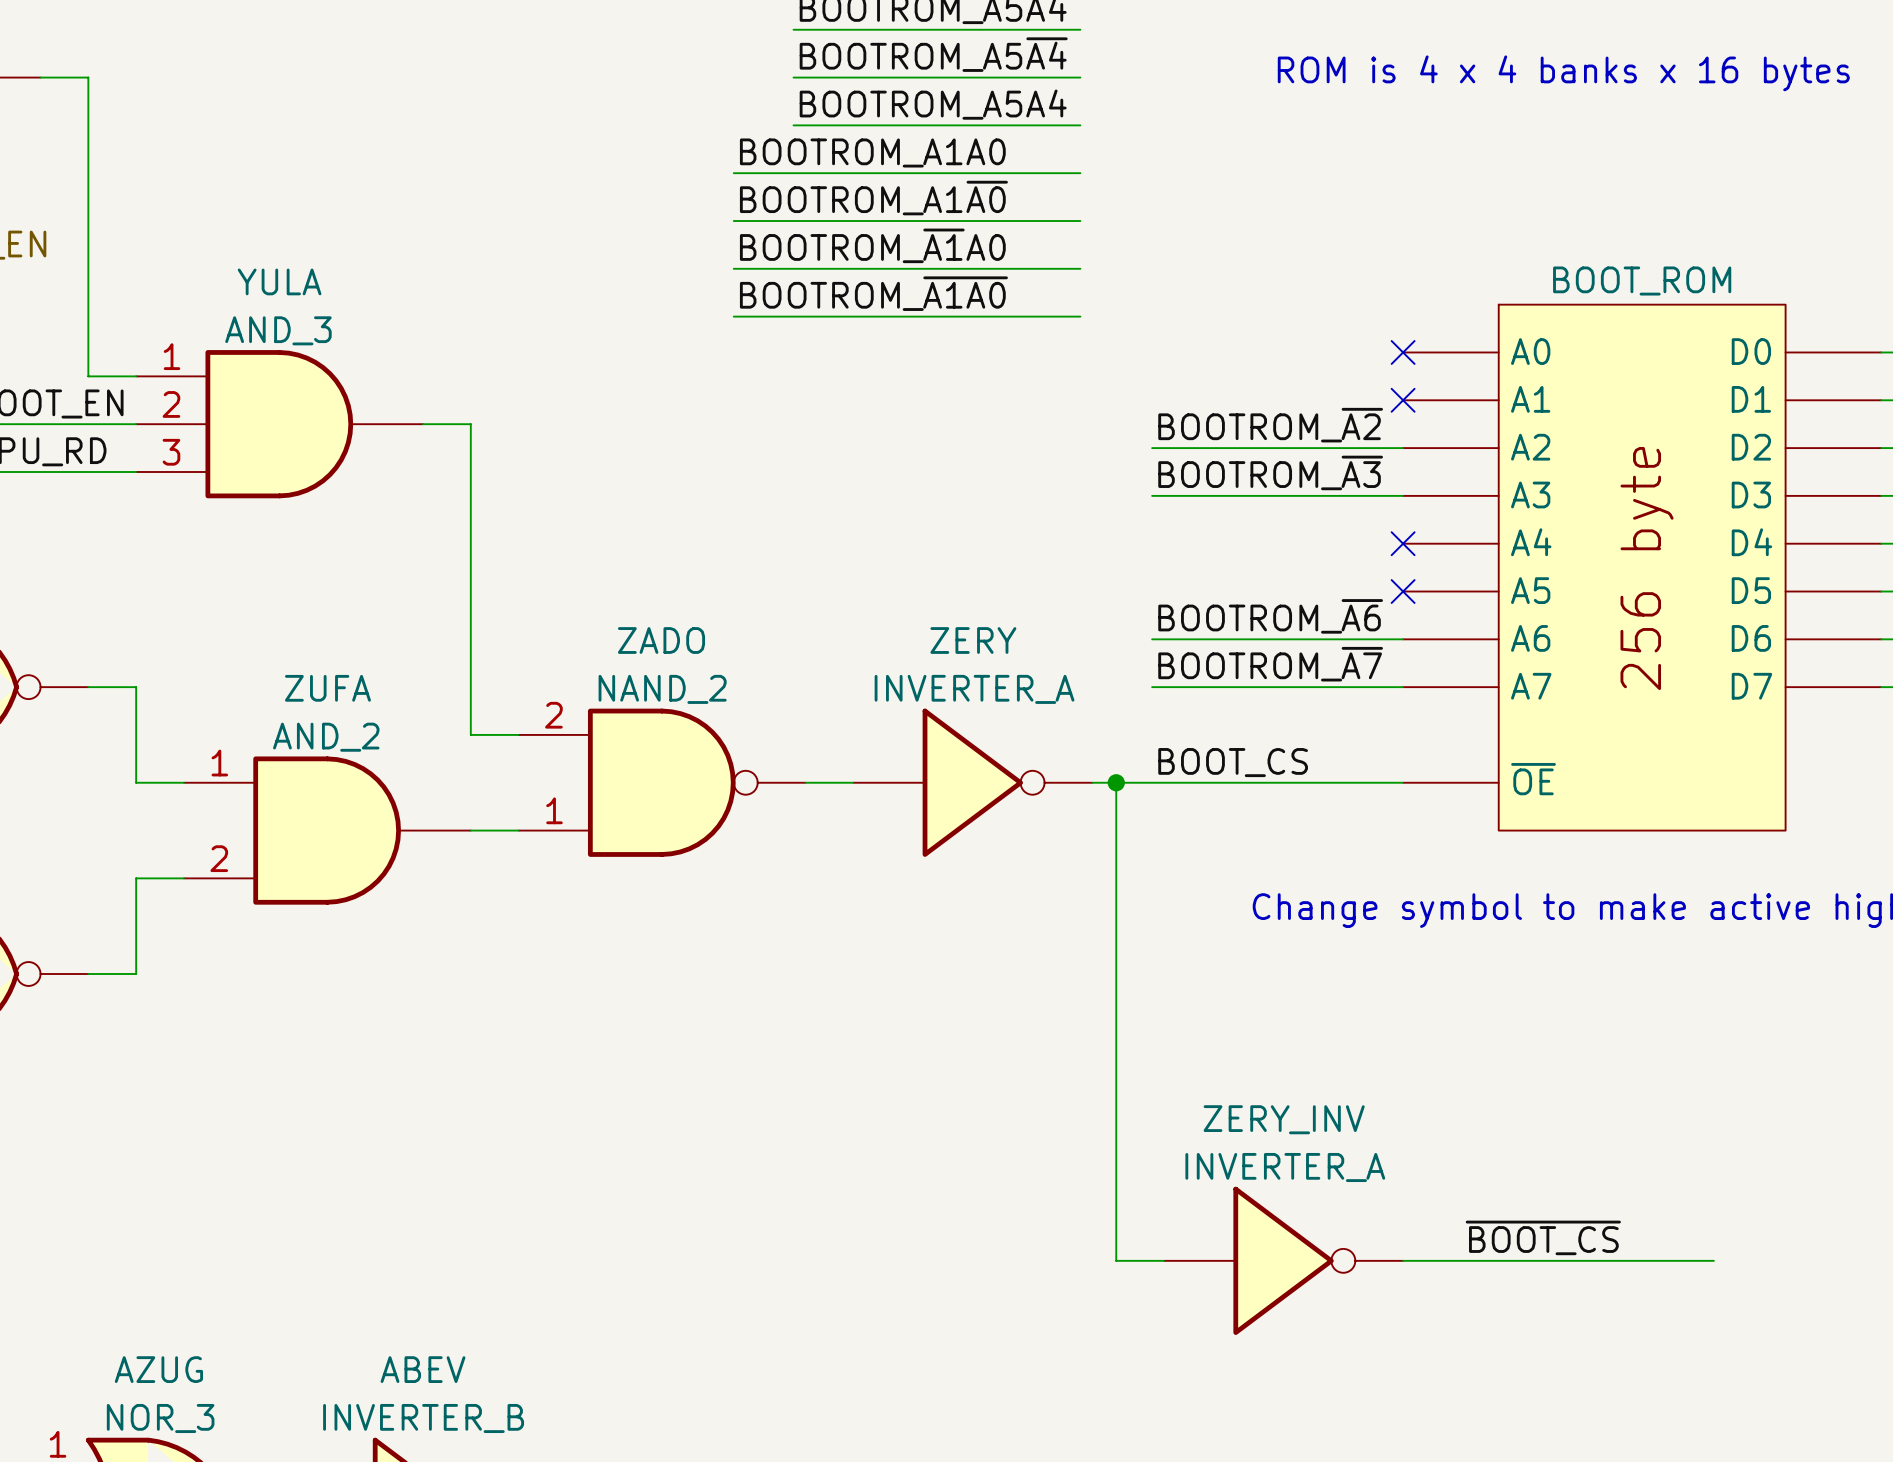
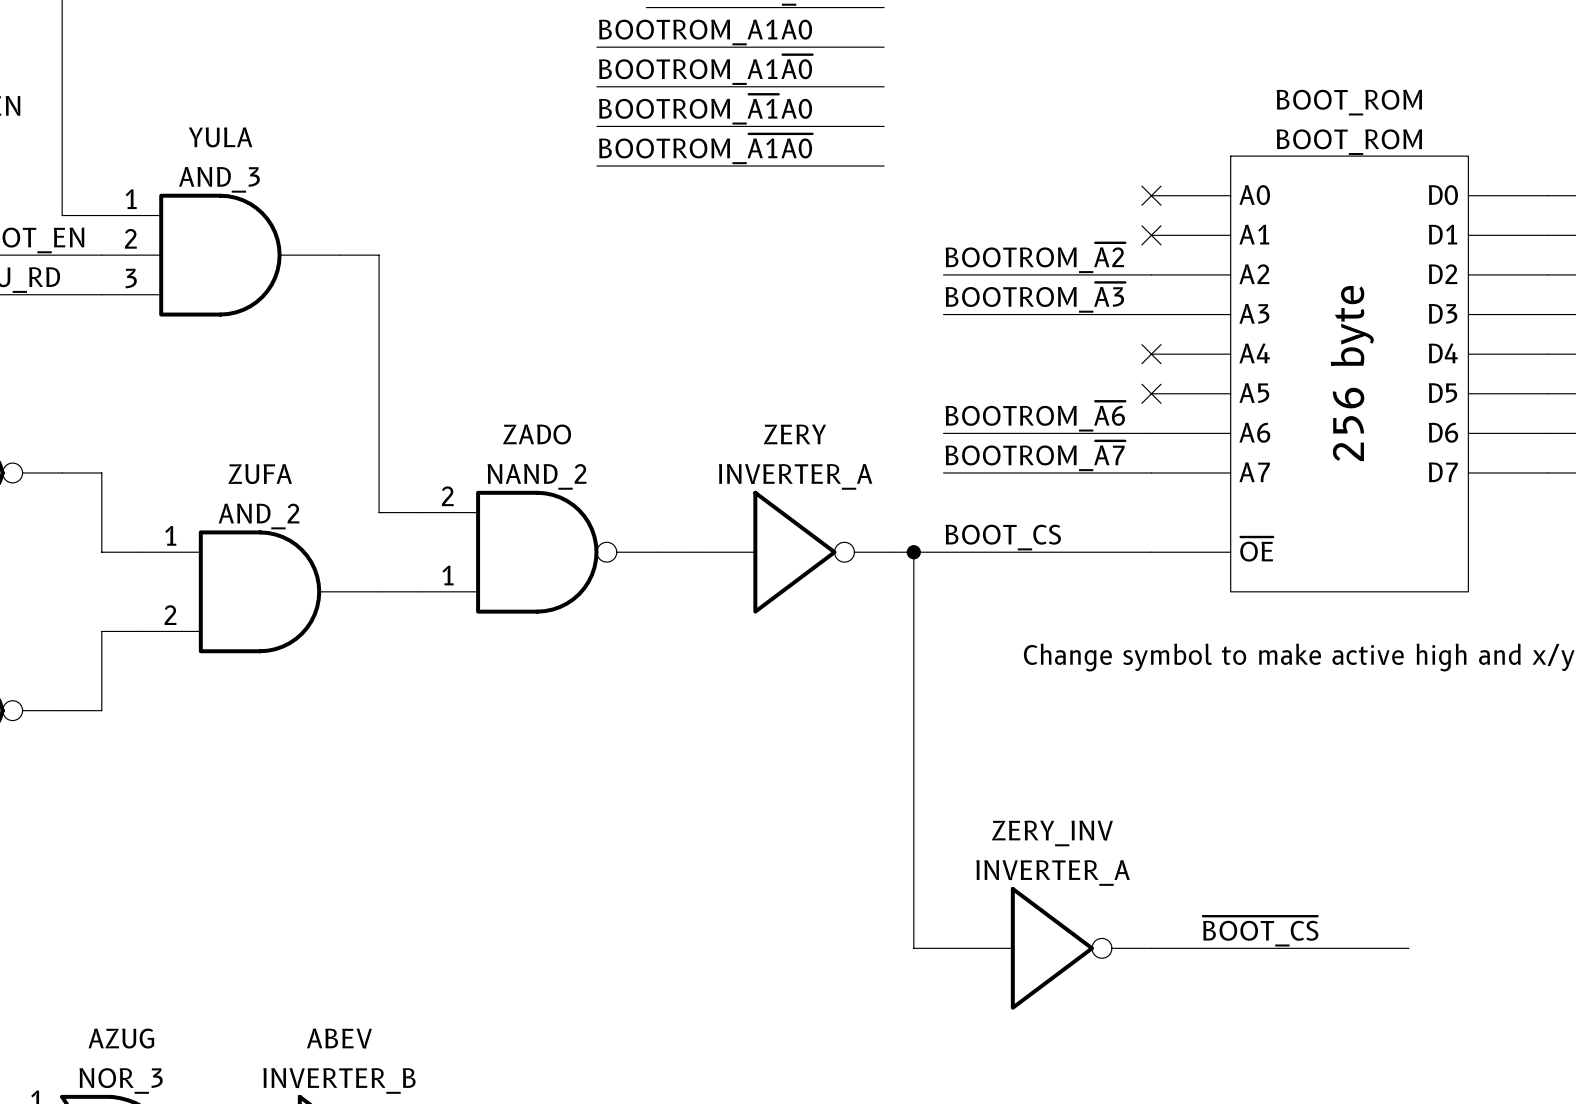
BOOT_ROM name position: BOOT_ROM (1642, 281) -> BOOT_ROM (1349, 102)
BOOT_ROM value: none -> BOOT_ROM (1349, 142)

